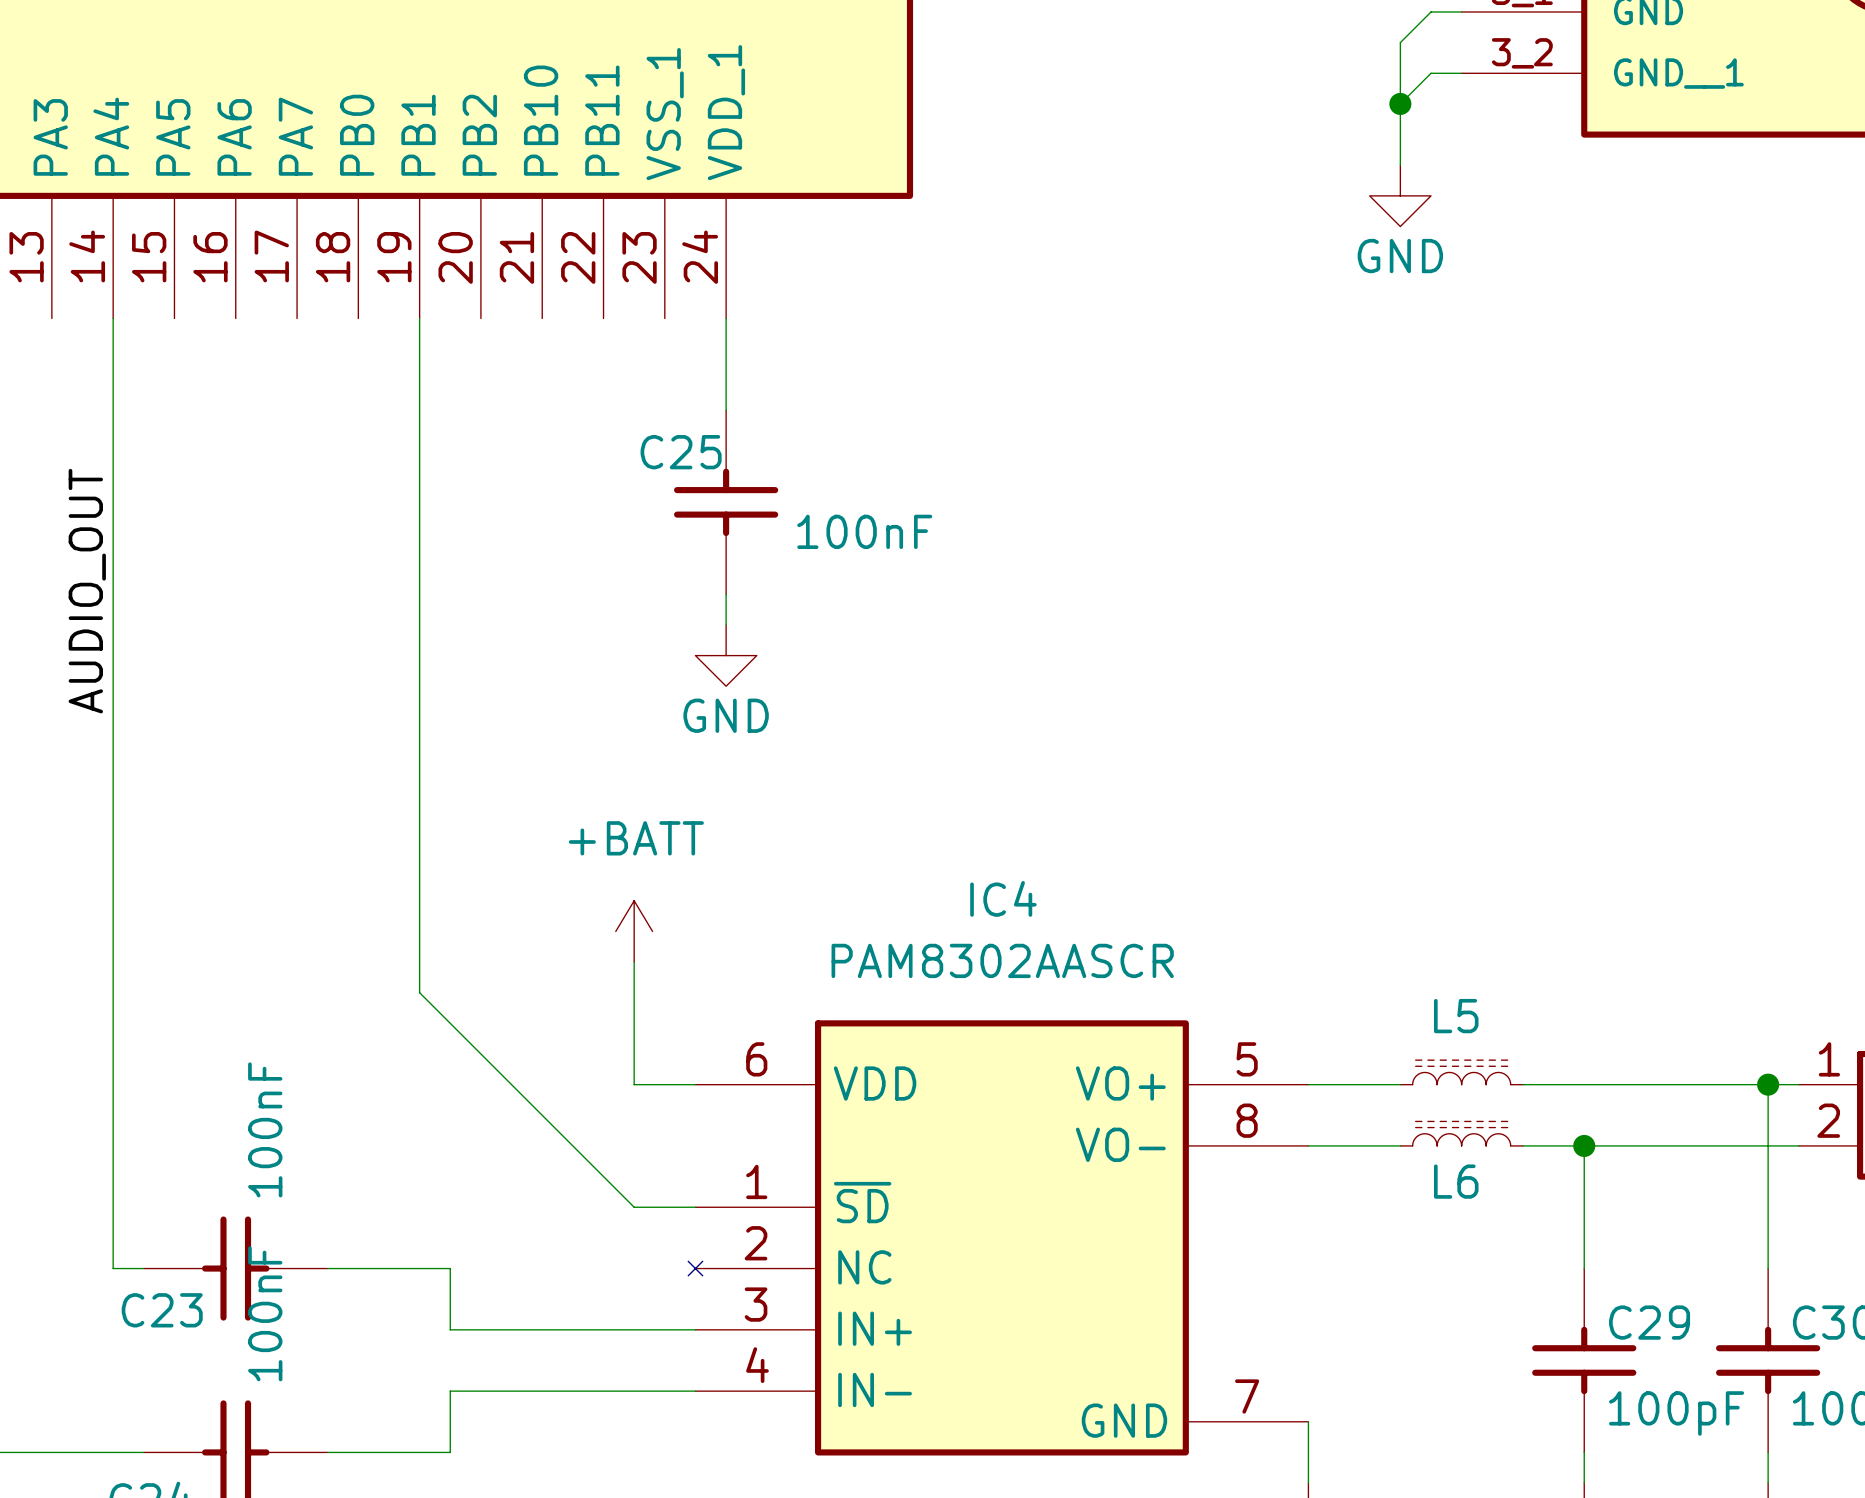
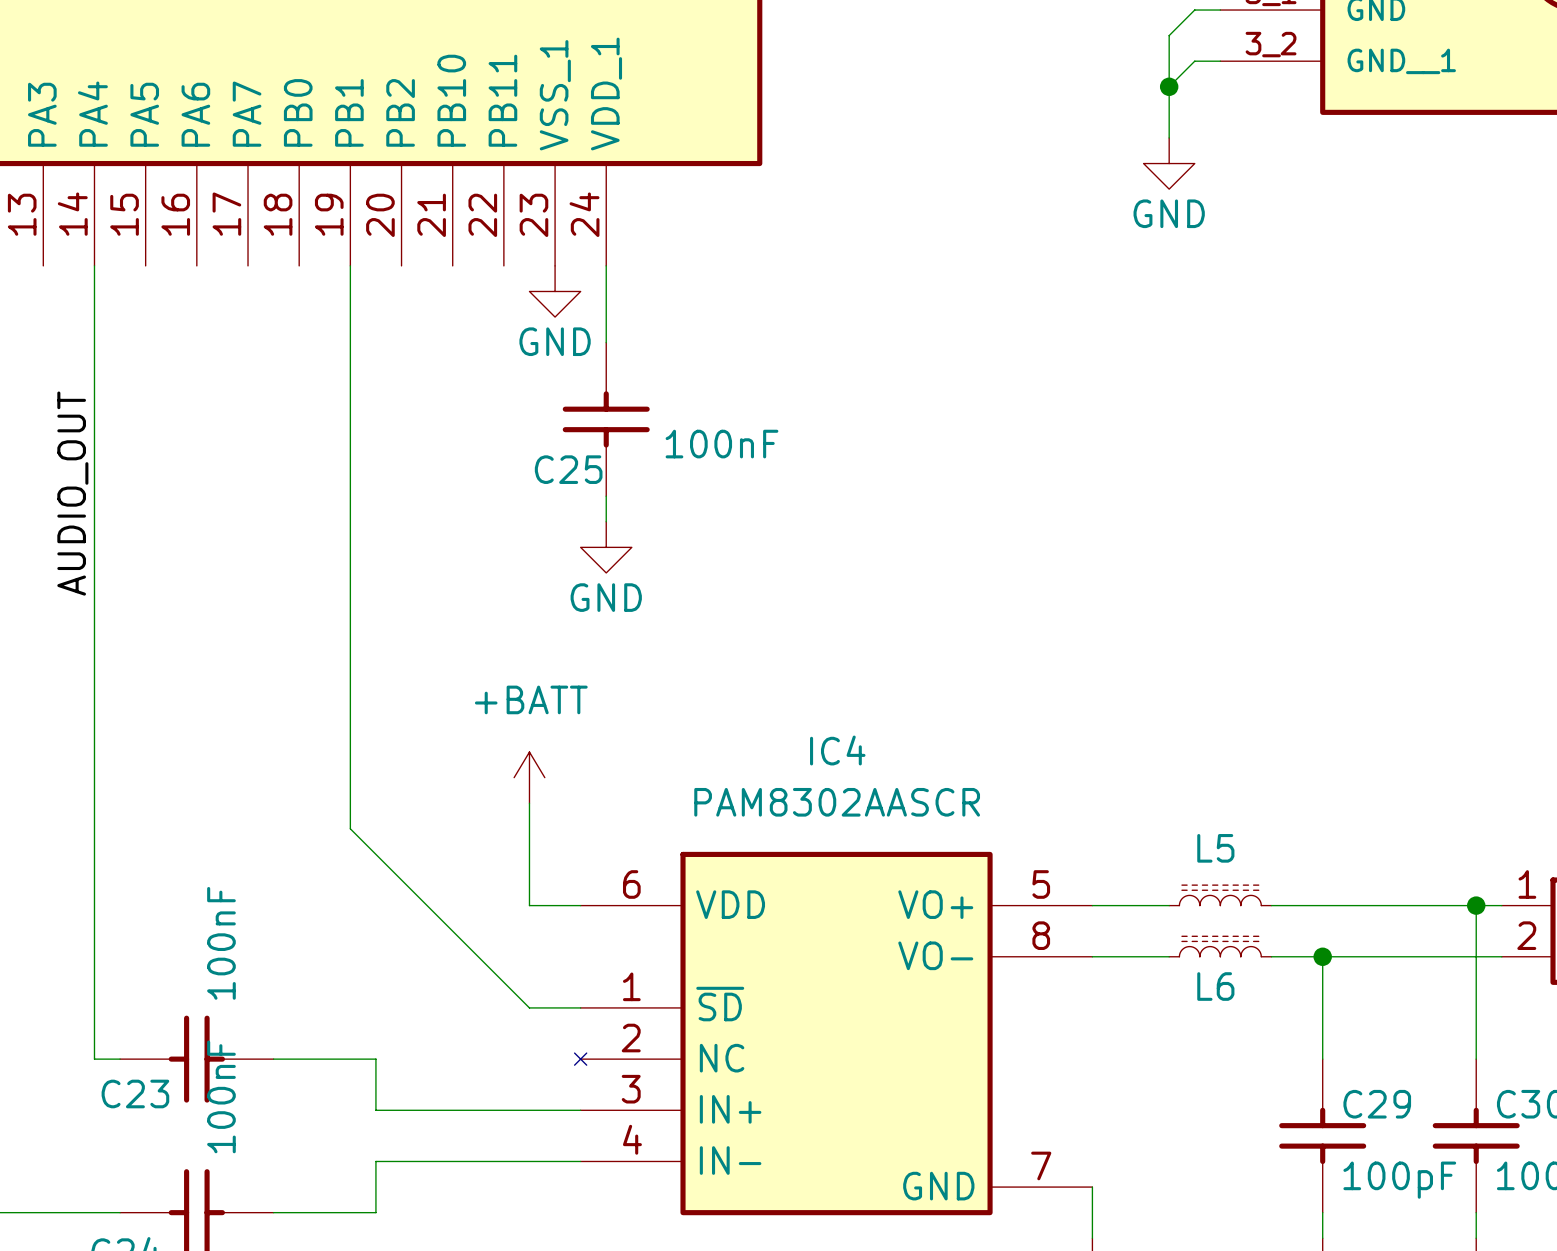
power symbol: none -> GND (555, 291)
C25 name position: C25 (681, 452) -> C25 (568, 469)

